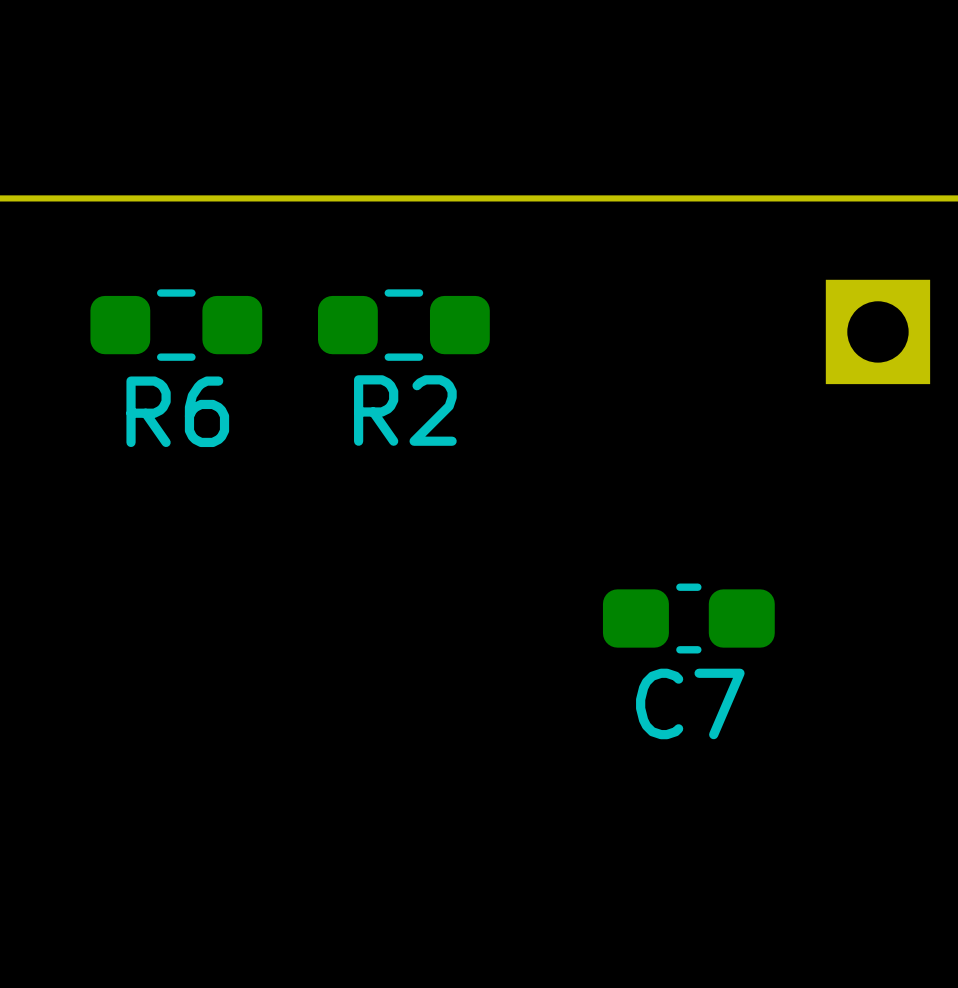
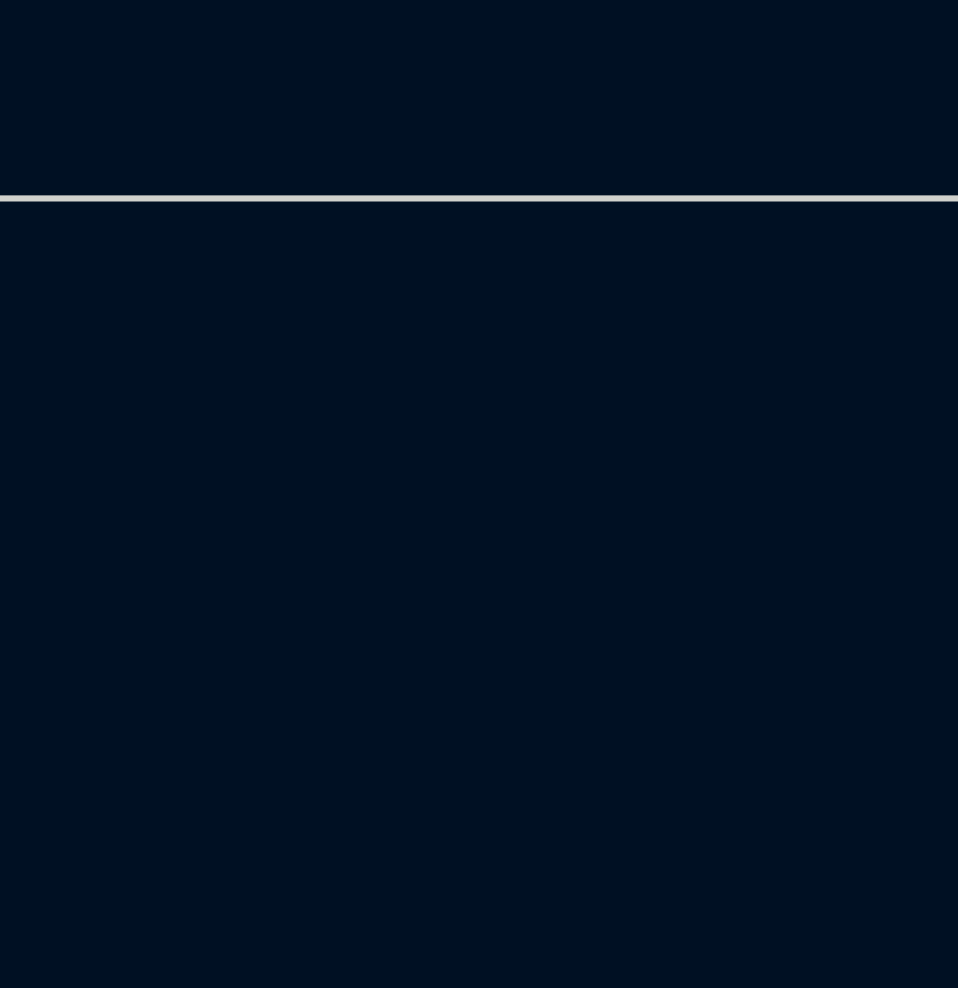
R6: (176, 325) -> none
R2: (403, 325) -> none
part: (877, 331) -> none
C7: (688, 618) -> none

